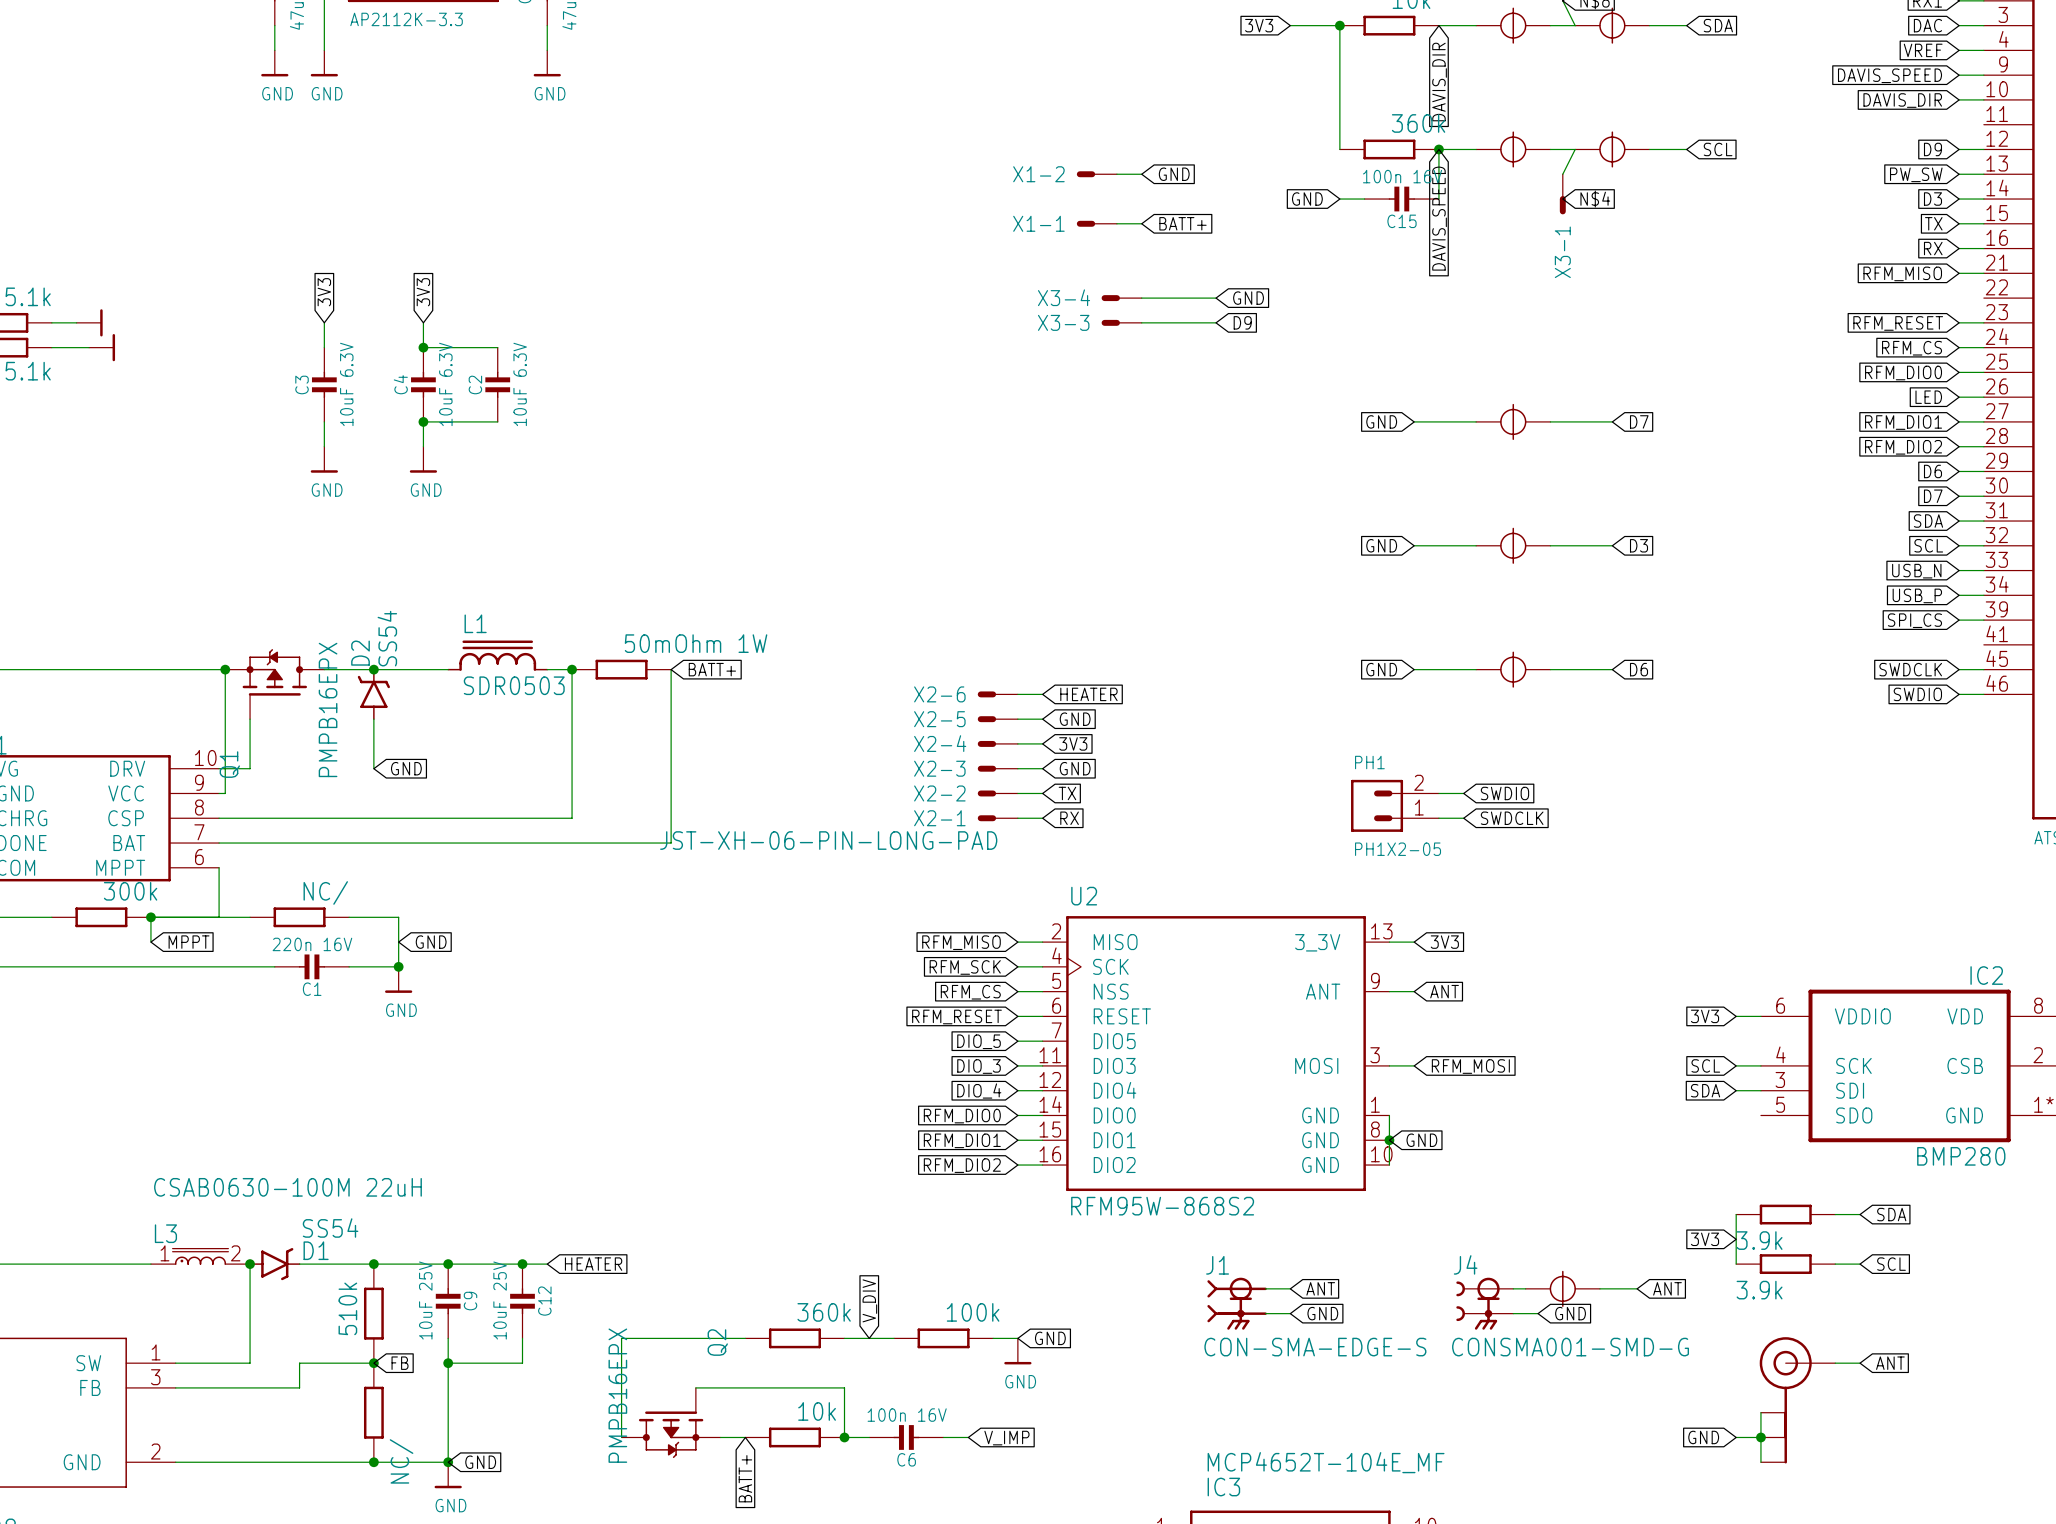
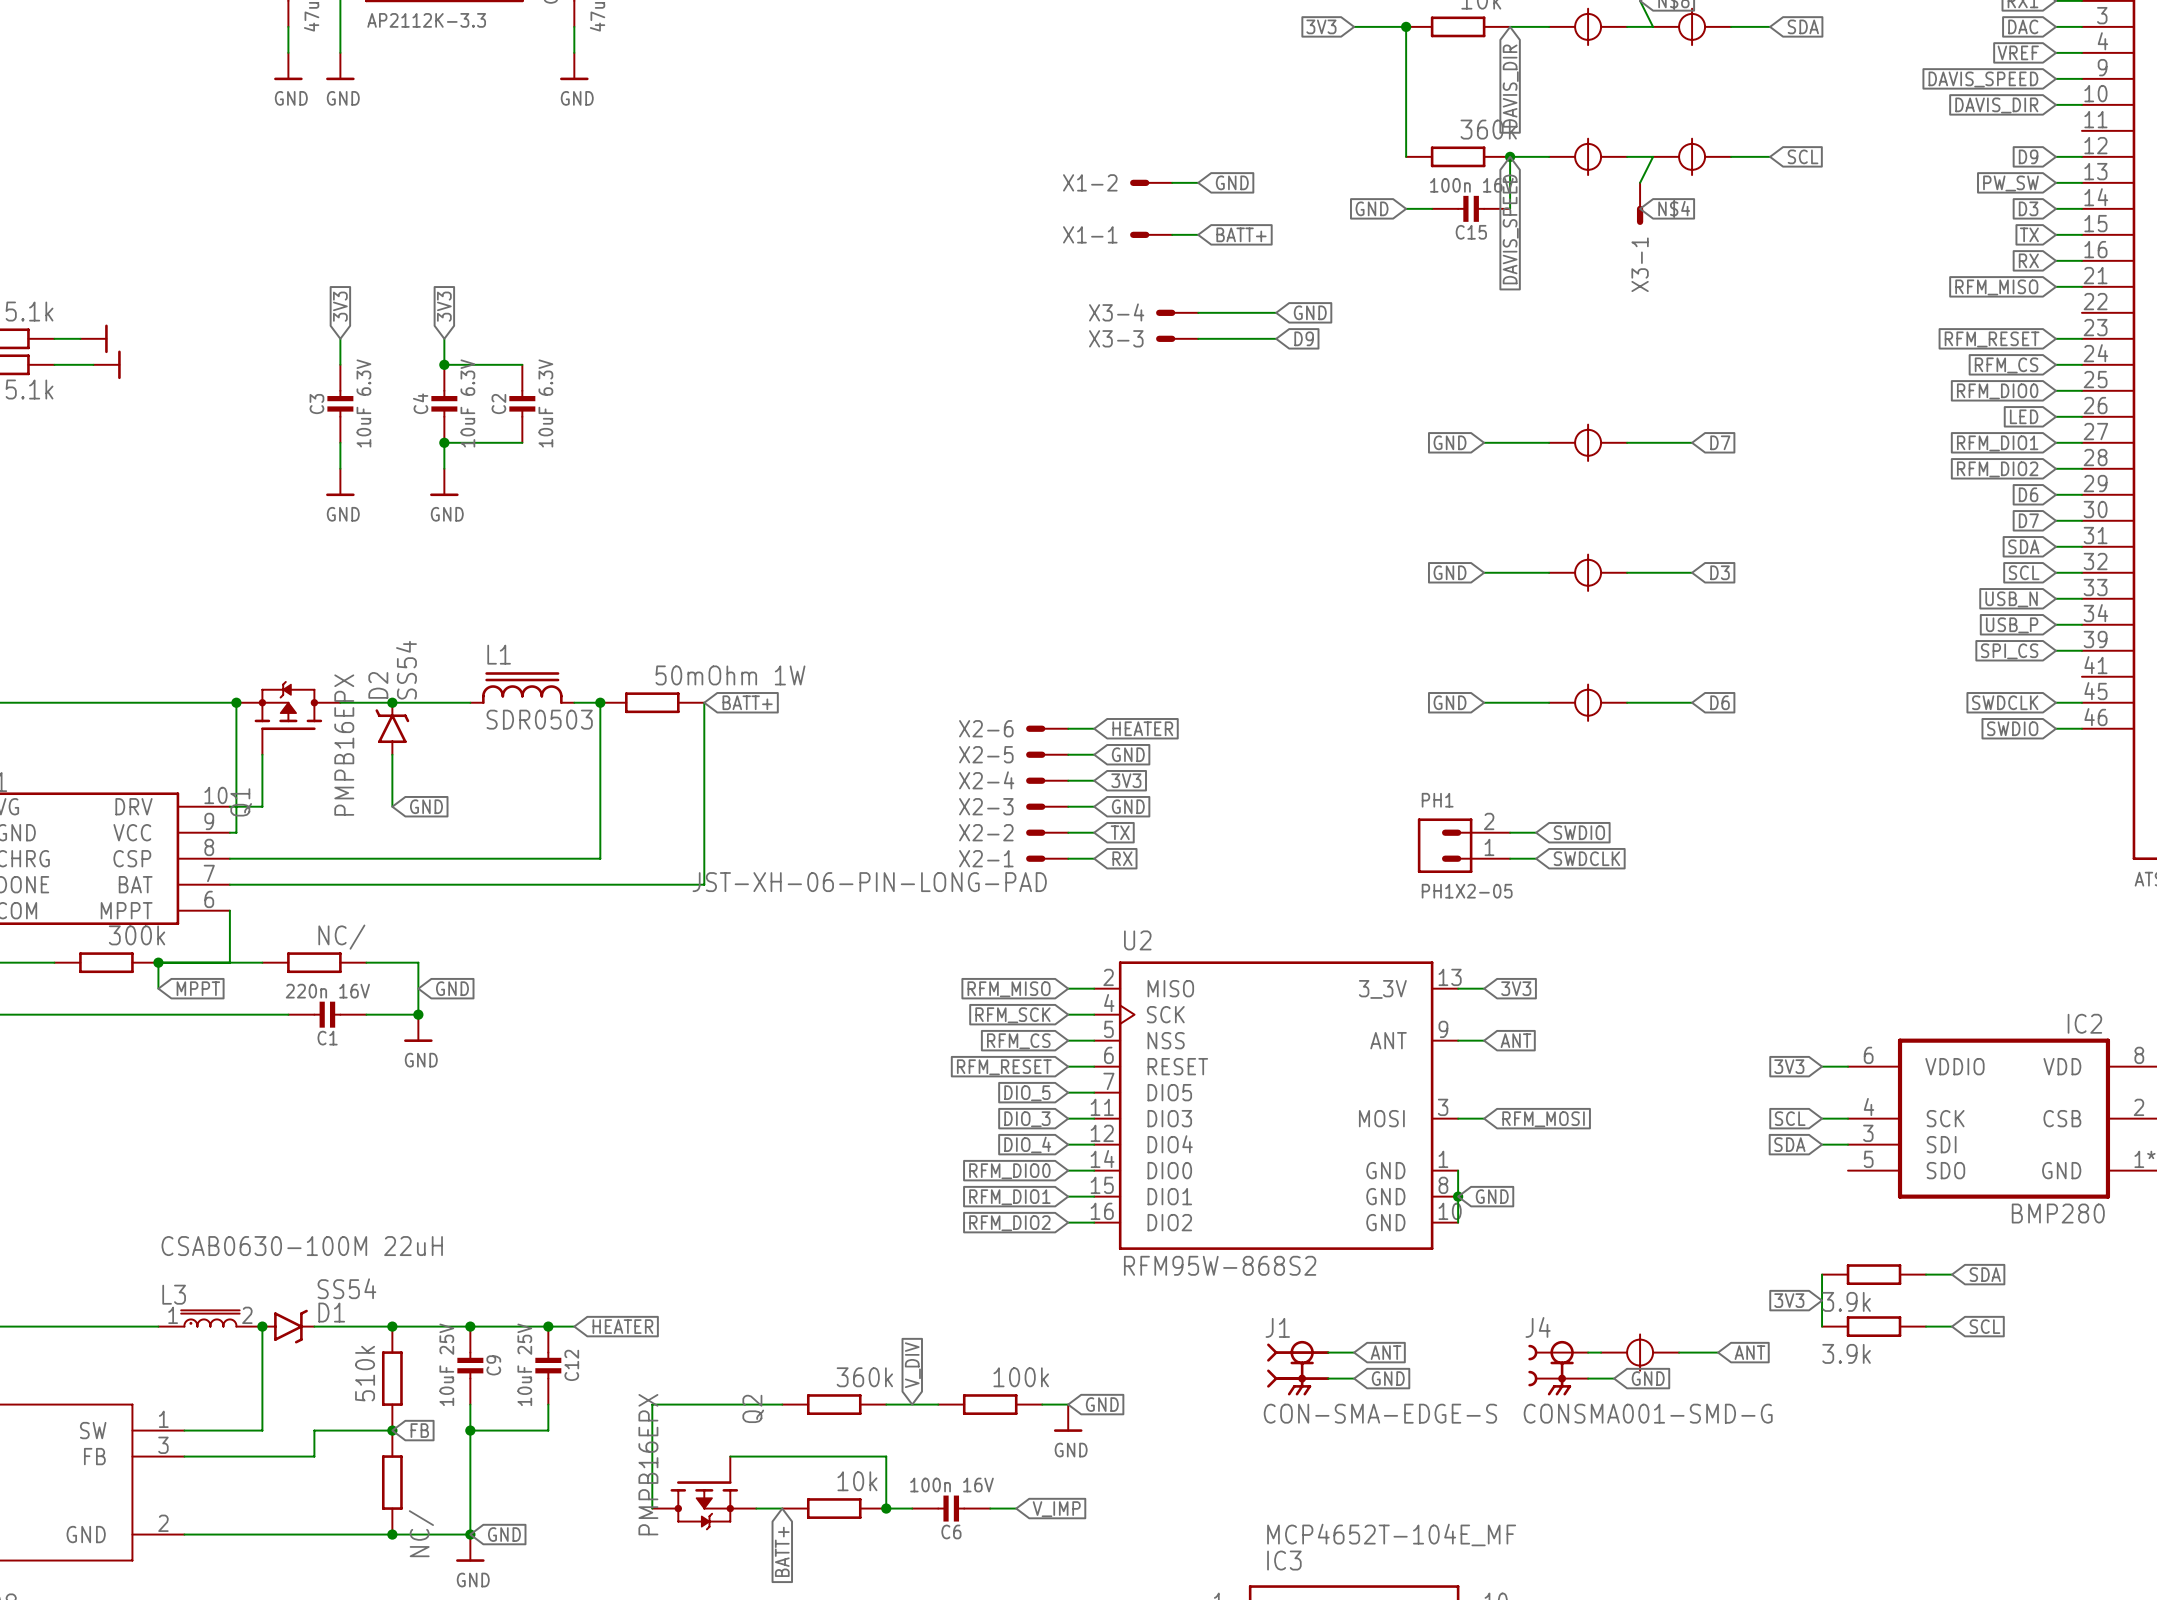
wire: (1835, 1363) (1860, 1363) -> none
global label: ANT (1890, 1363) -> none
part: (1797, 1400) -> none
wire: (1760, 1412) (1760, 1462) -> none
global label: GND (1703, 1437) -> none
wire: (1736, 1437) (1760, 1437) -> none
junction: (1760, 1437) -> none

